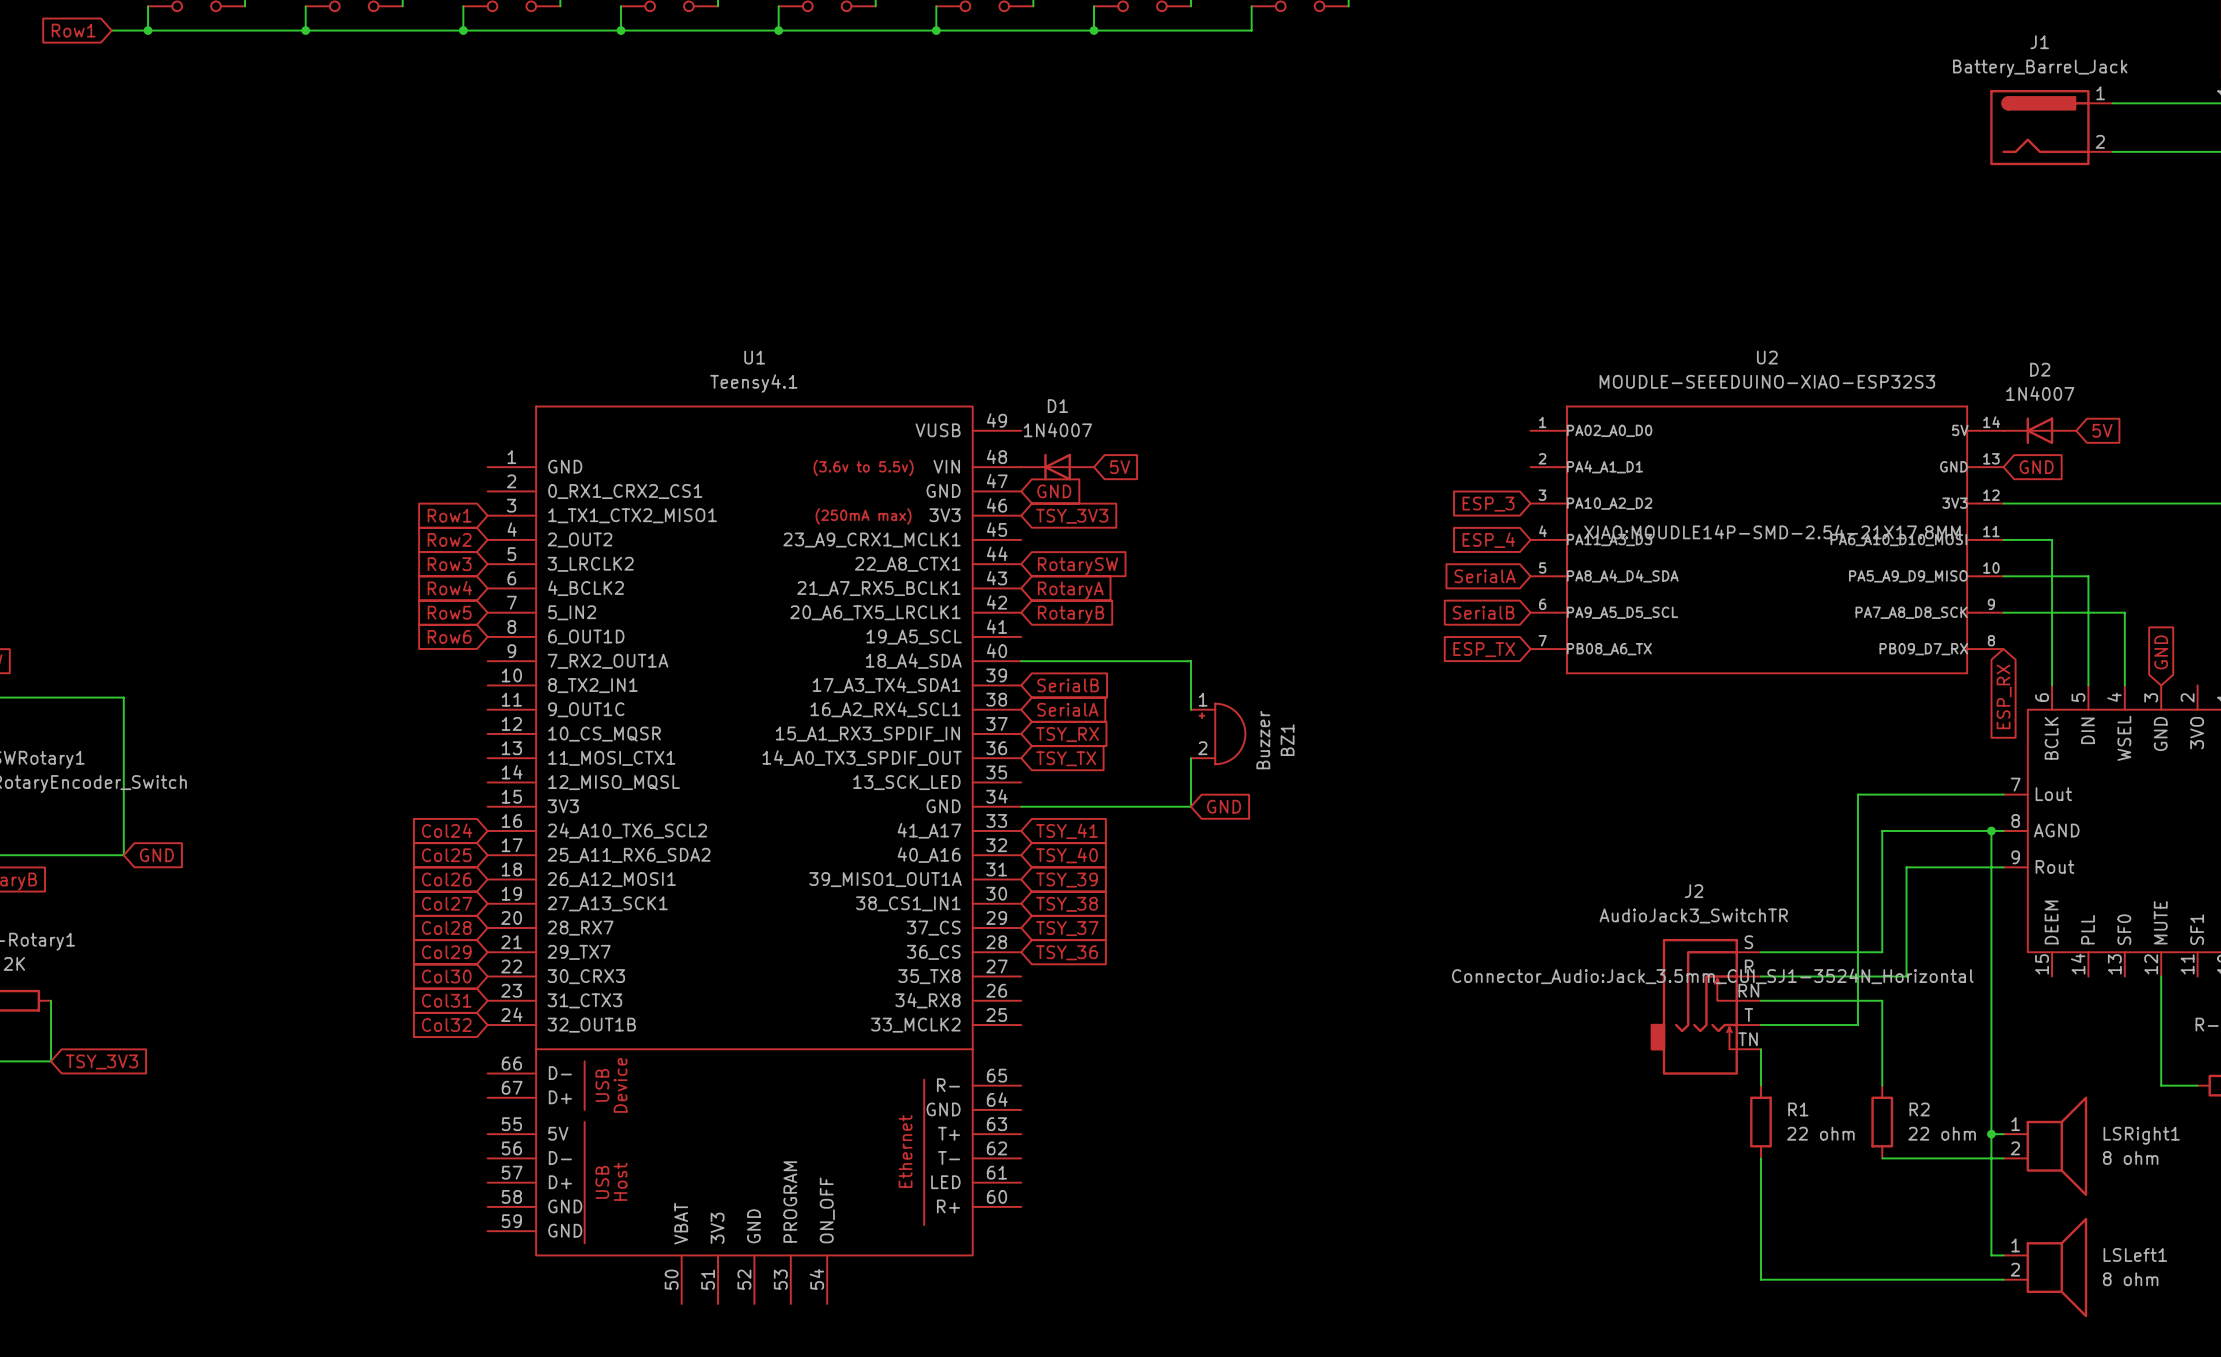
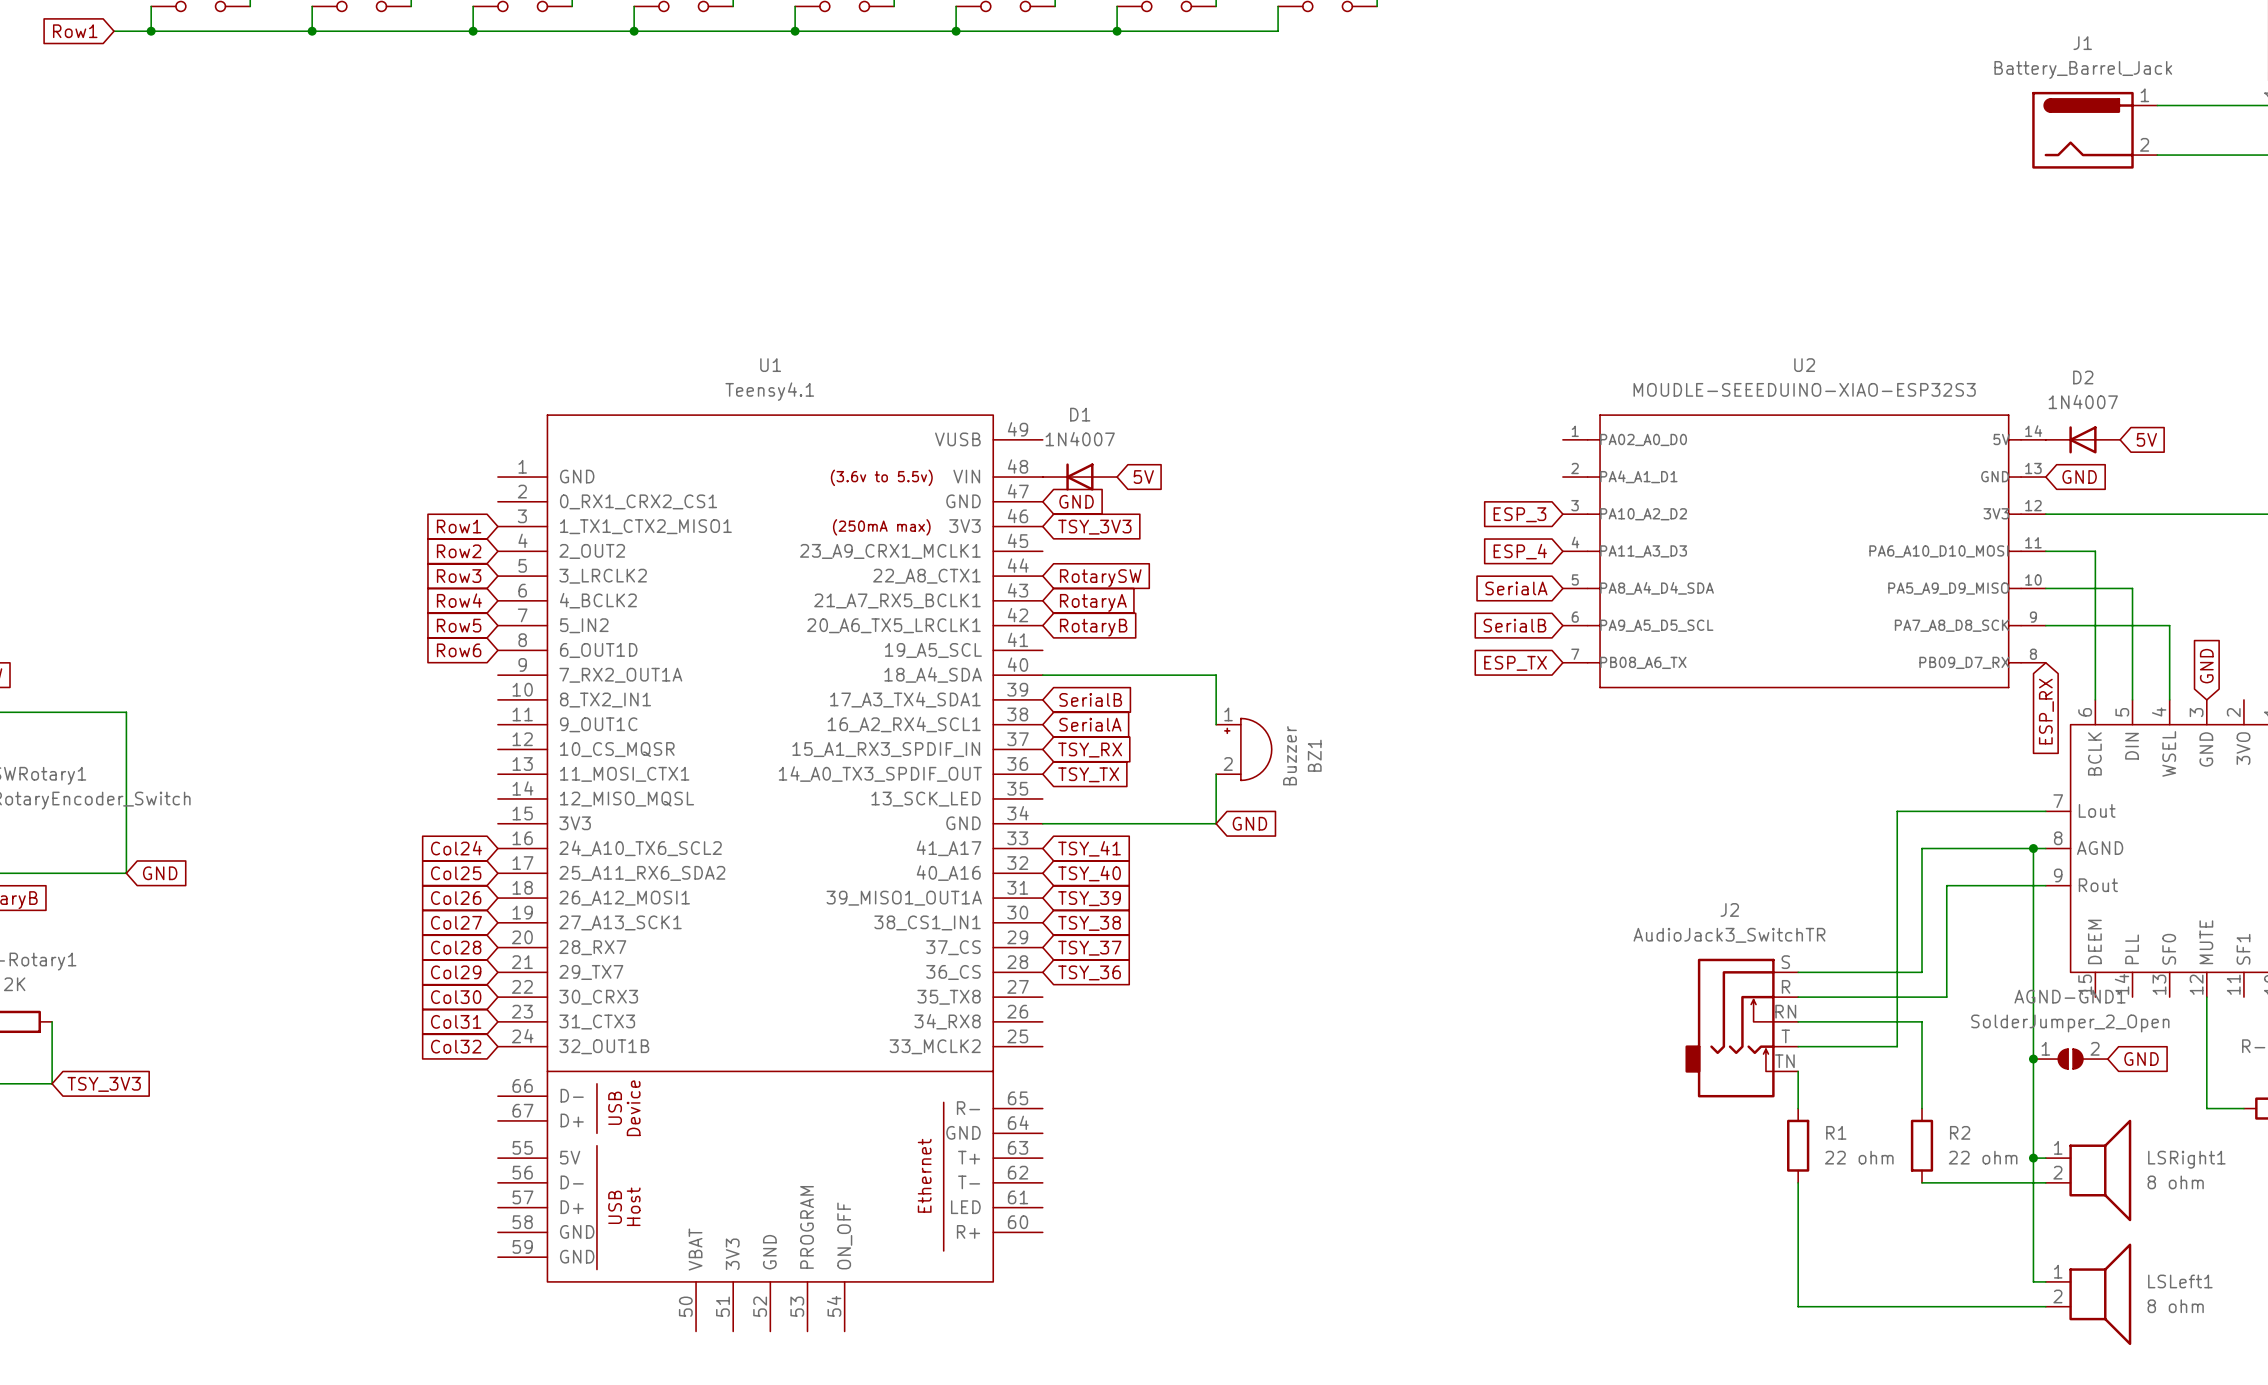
U2 text: XIAO:MOUDLE14P-SMD-2.54-21X17.8MM (1772, 532) -> none
J2 text: Connector_Audio:Jack_3.5mm_CUI_SJ1-3524N_Horizontal (1712, 976) -> none
junction: none -> (2033, 1059)
AGND-GND1: none -> SolderJumper_2_Open (2070, 1059)
global label: none -> GND (2141, 1059)

